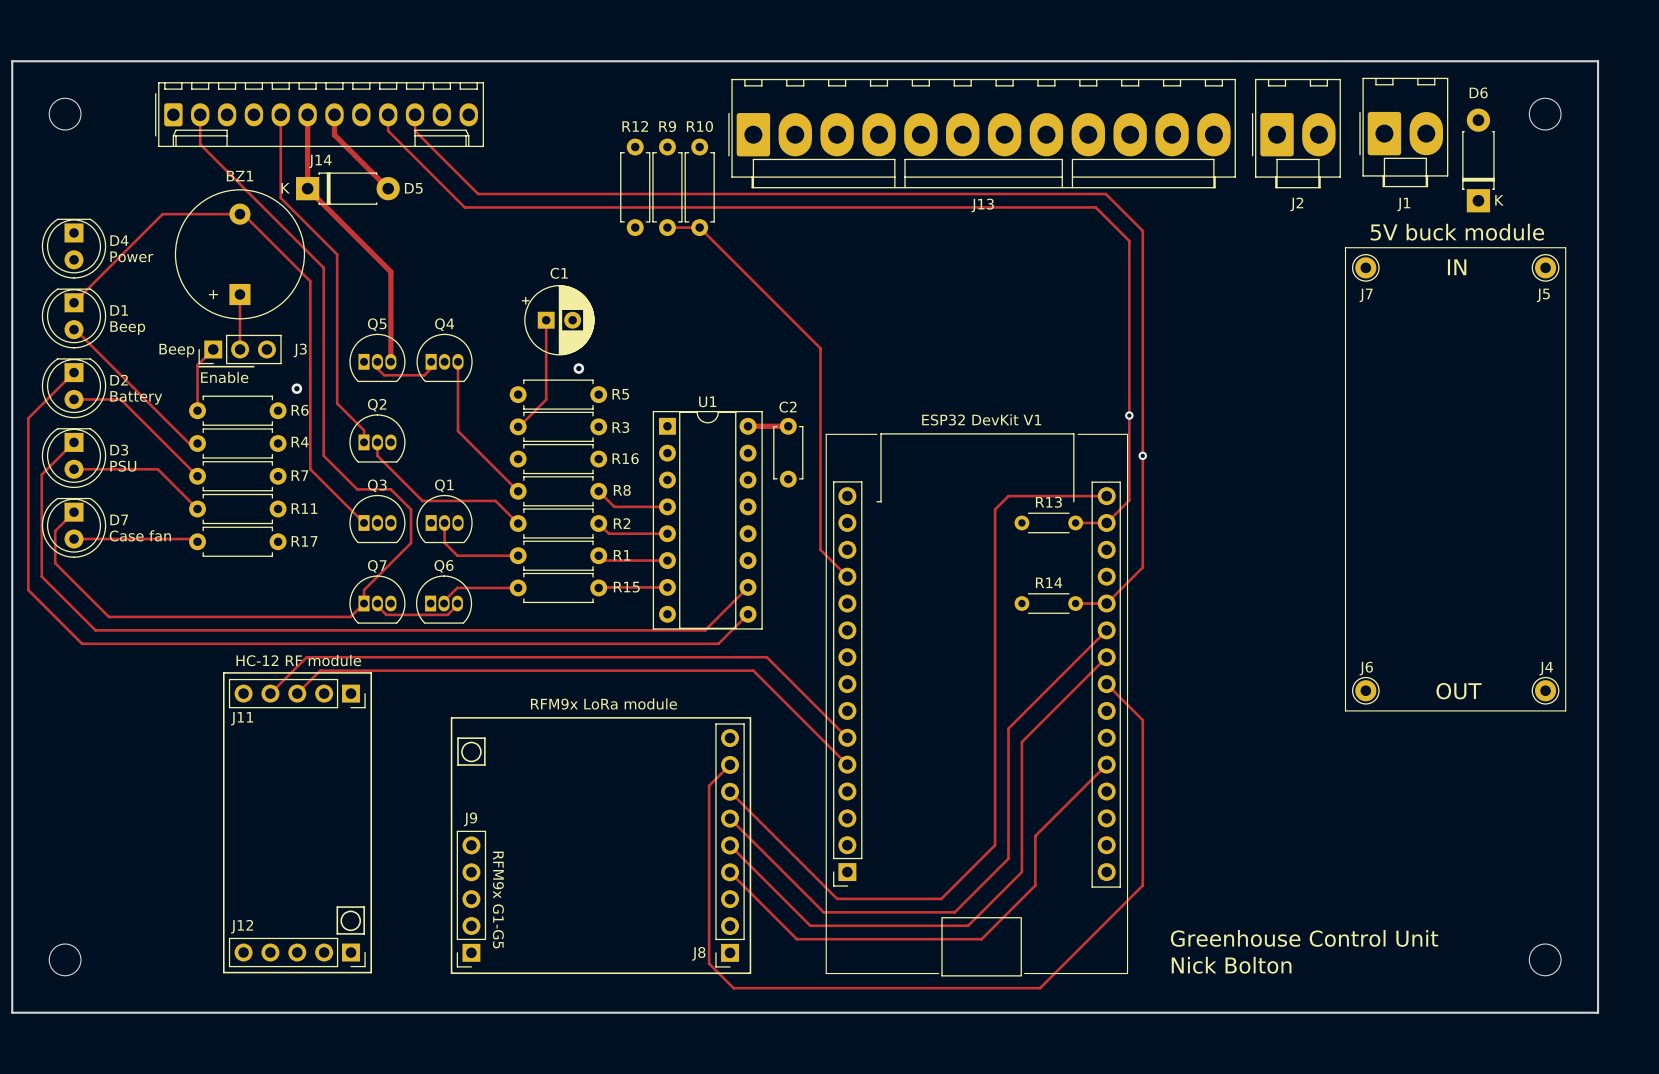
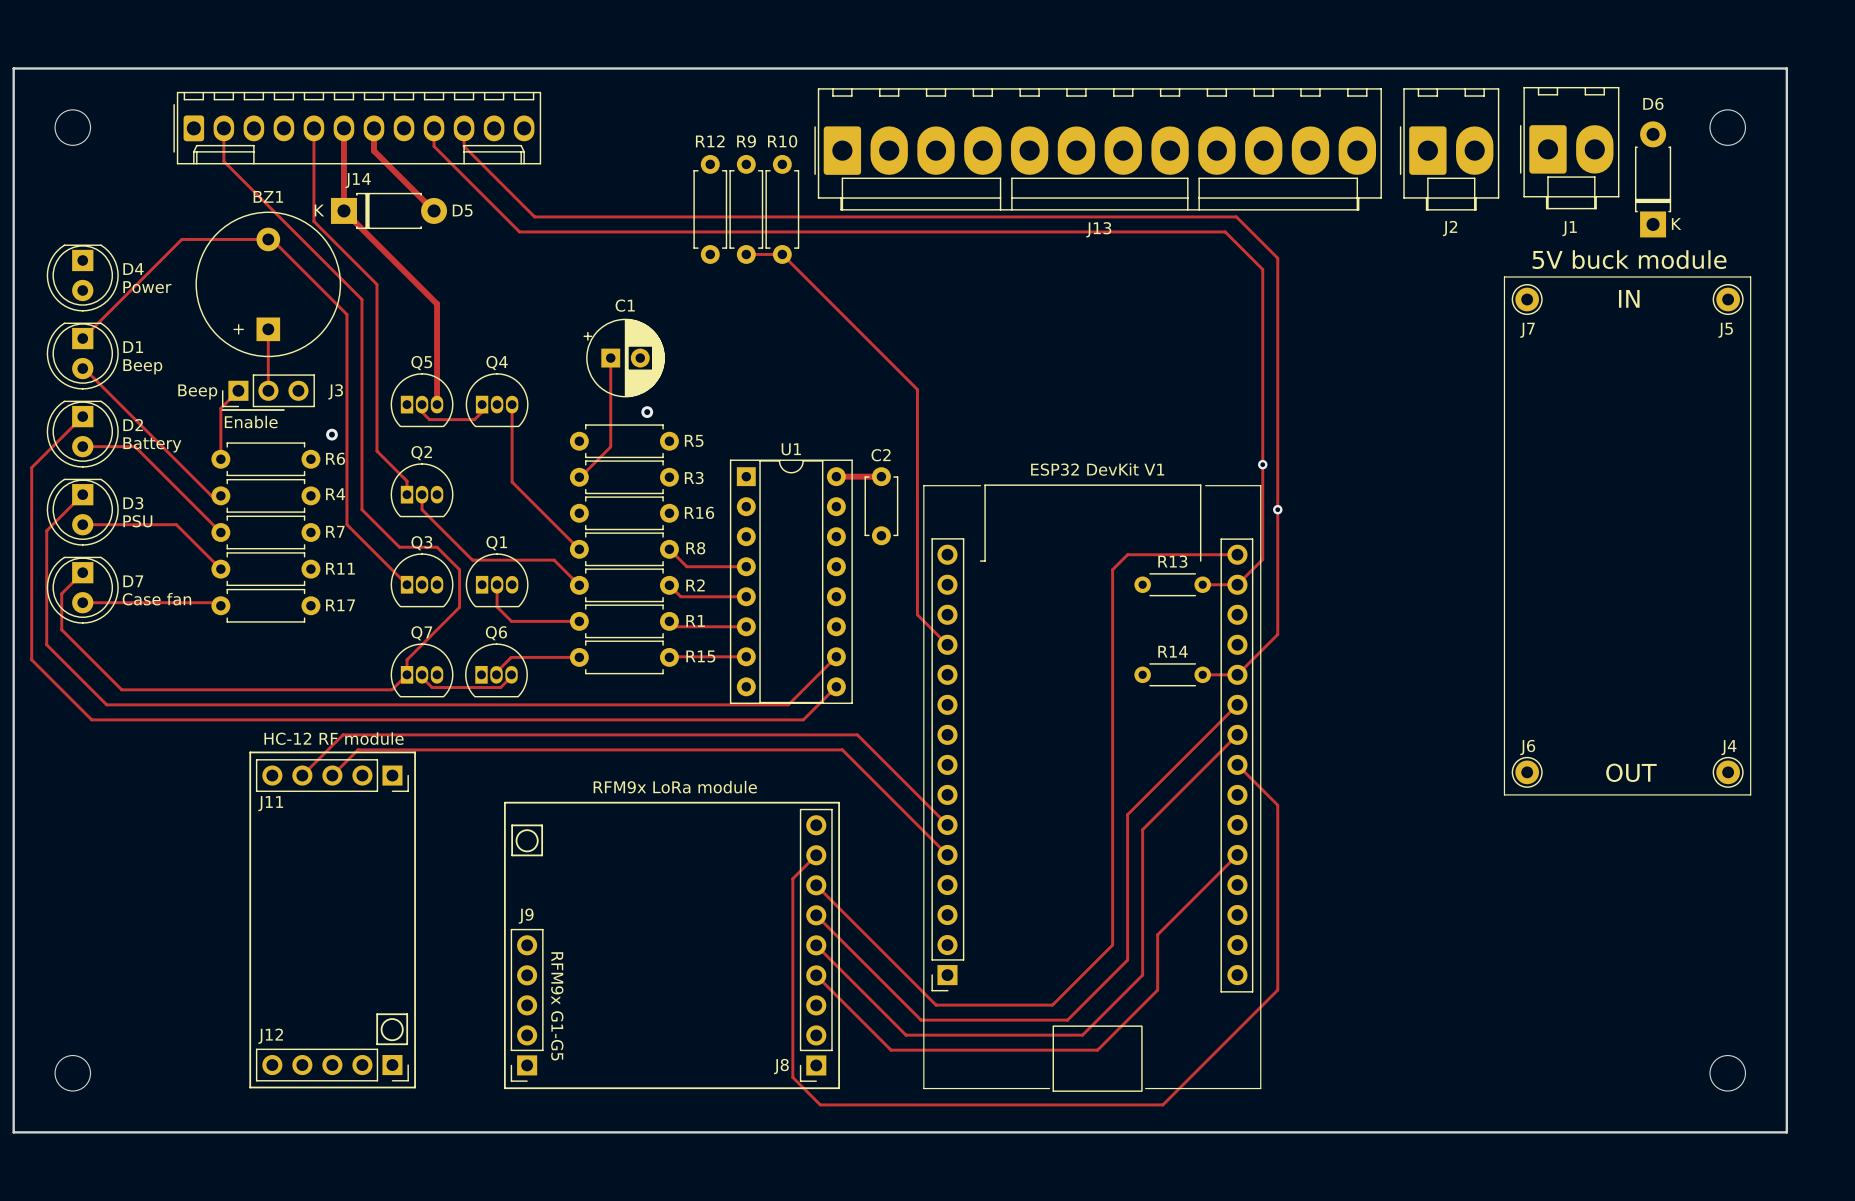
text: Greenhouse Control Unit (1304, 938) -> none
text: Nick Bolton (1231, 965) -> none

